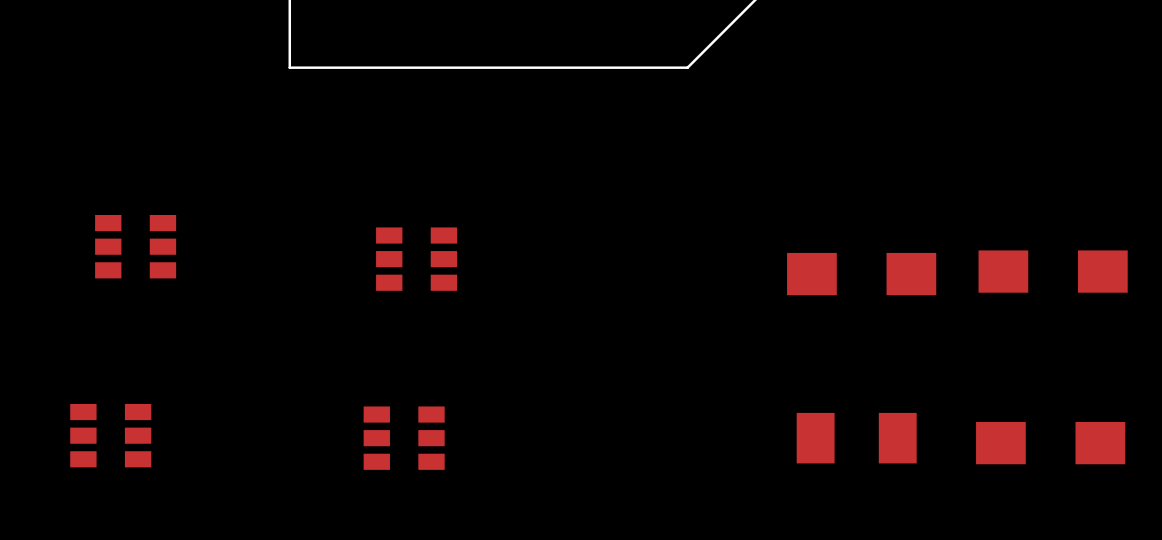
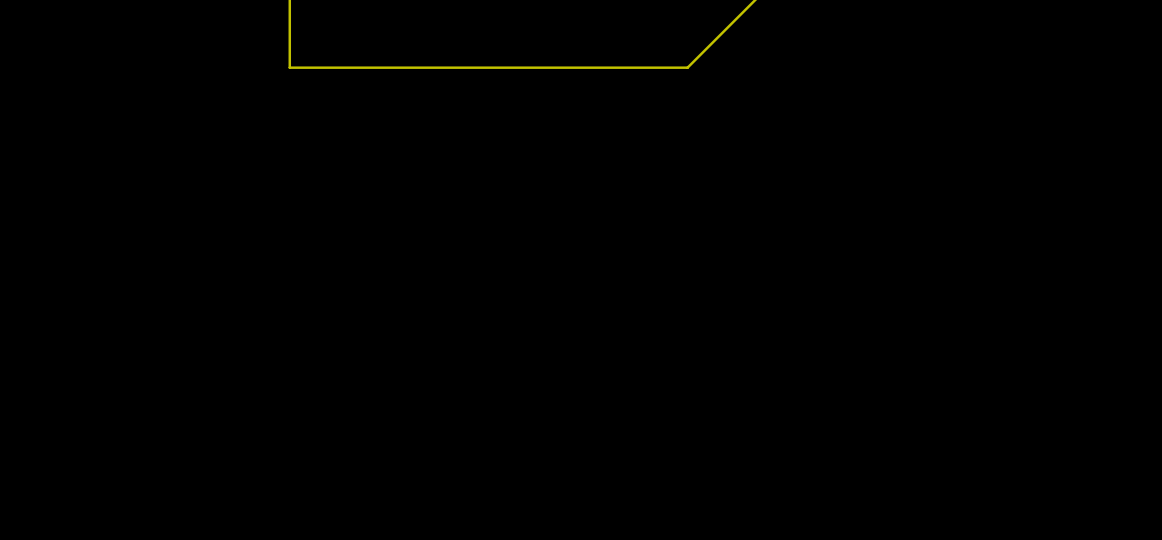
part: (135, 246) -> none
part: (416, 259) -> none
part: (1053, 271) -> none
part: (861, 274) -> none
part: (110, 435) -> none
part: (404, 438) -> none
part: (856, 438) -> none
part: (1050, 443) -> none

